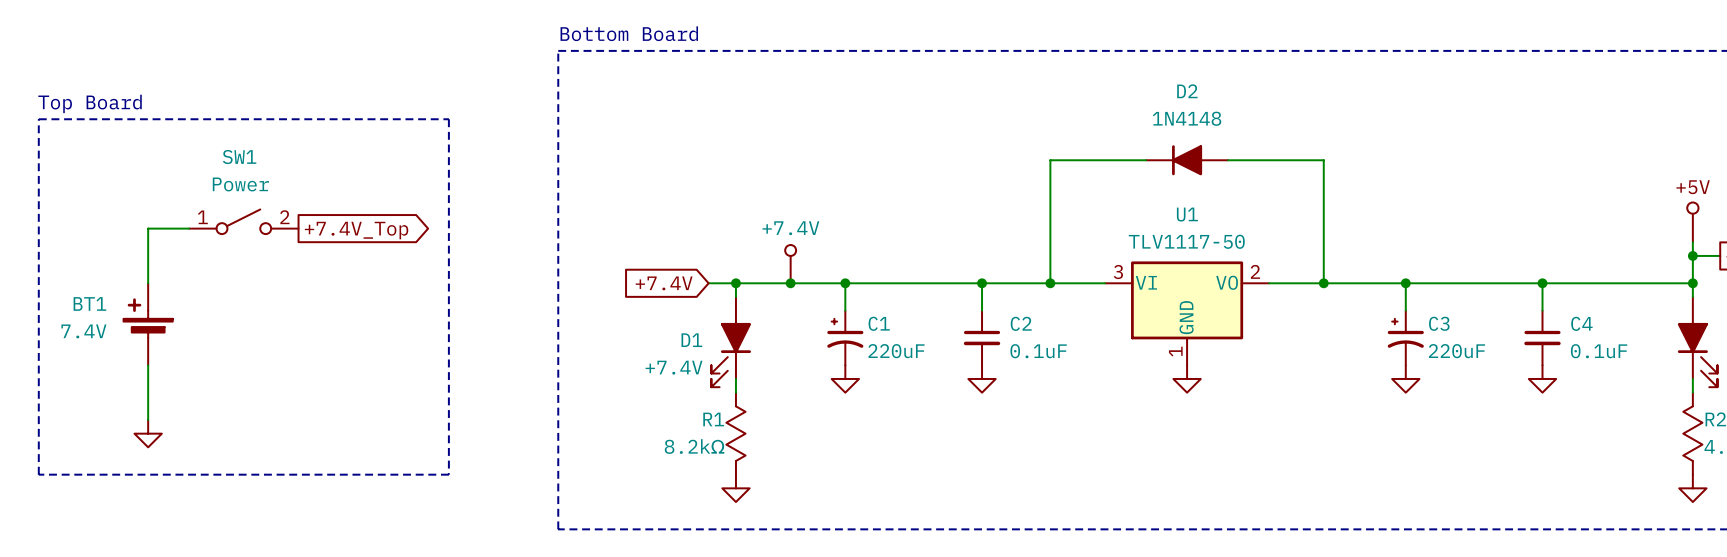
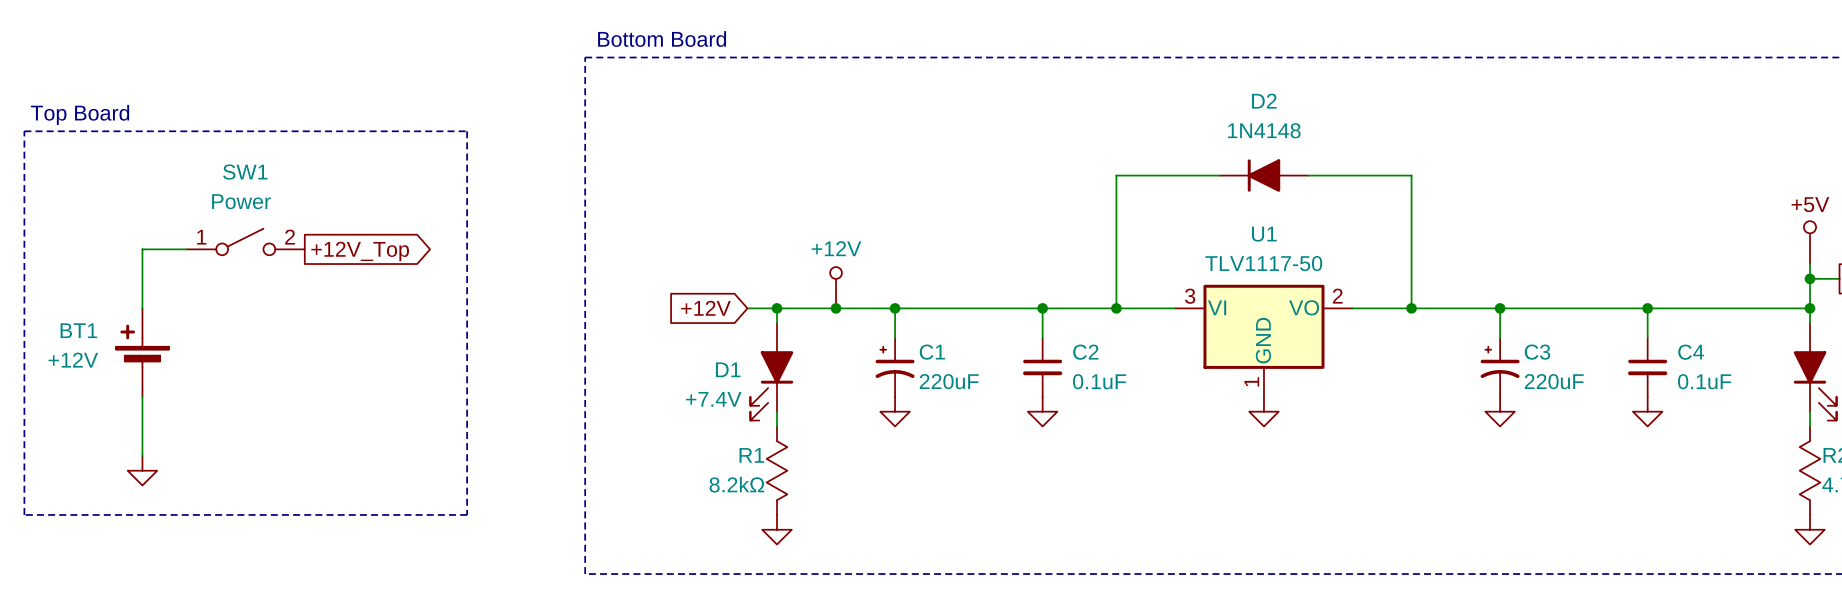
global label: +7.4V_Top (356, 230) -> +12V_Top (360, 251)
power symbol: +7.4V (790, 264) -> +12V (836, 287)
global label: +7.4V (664, 283) -> +12V (706, 308)
BT1 value: 7.4V (83, 331) -> +12V (73, 360)

